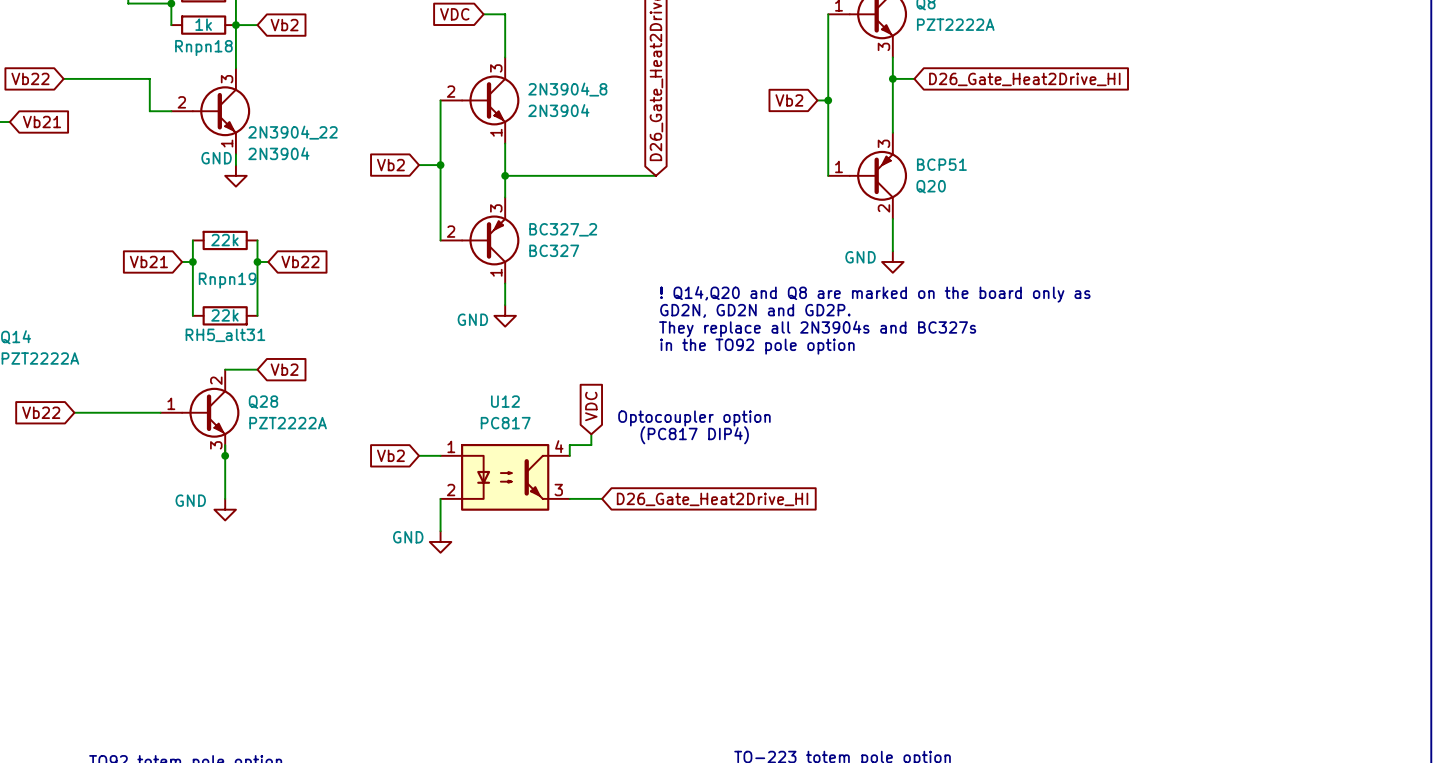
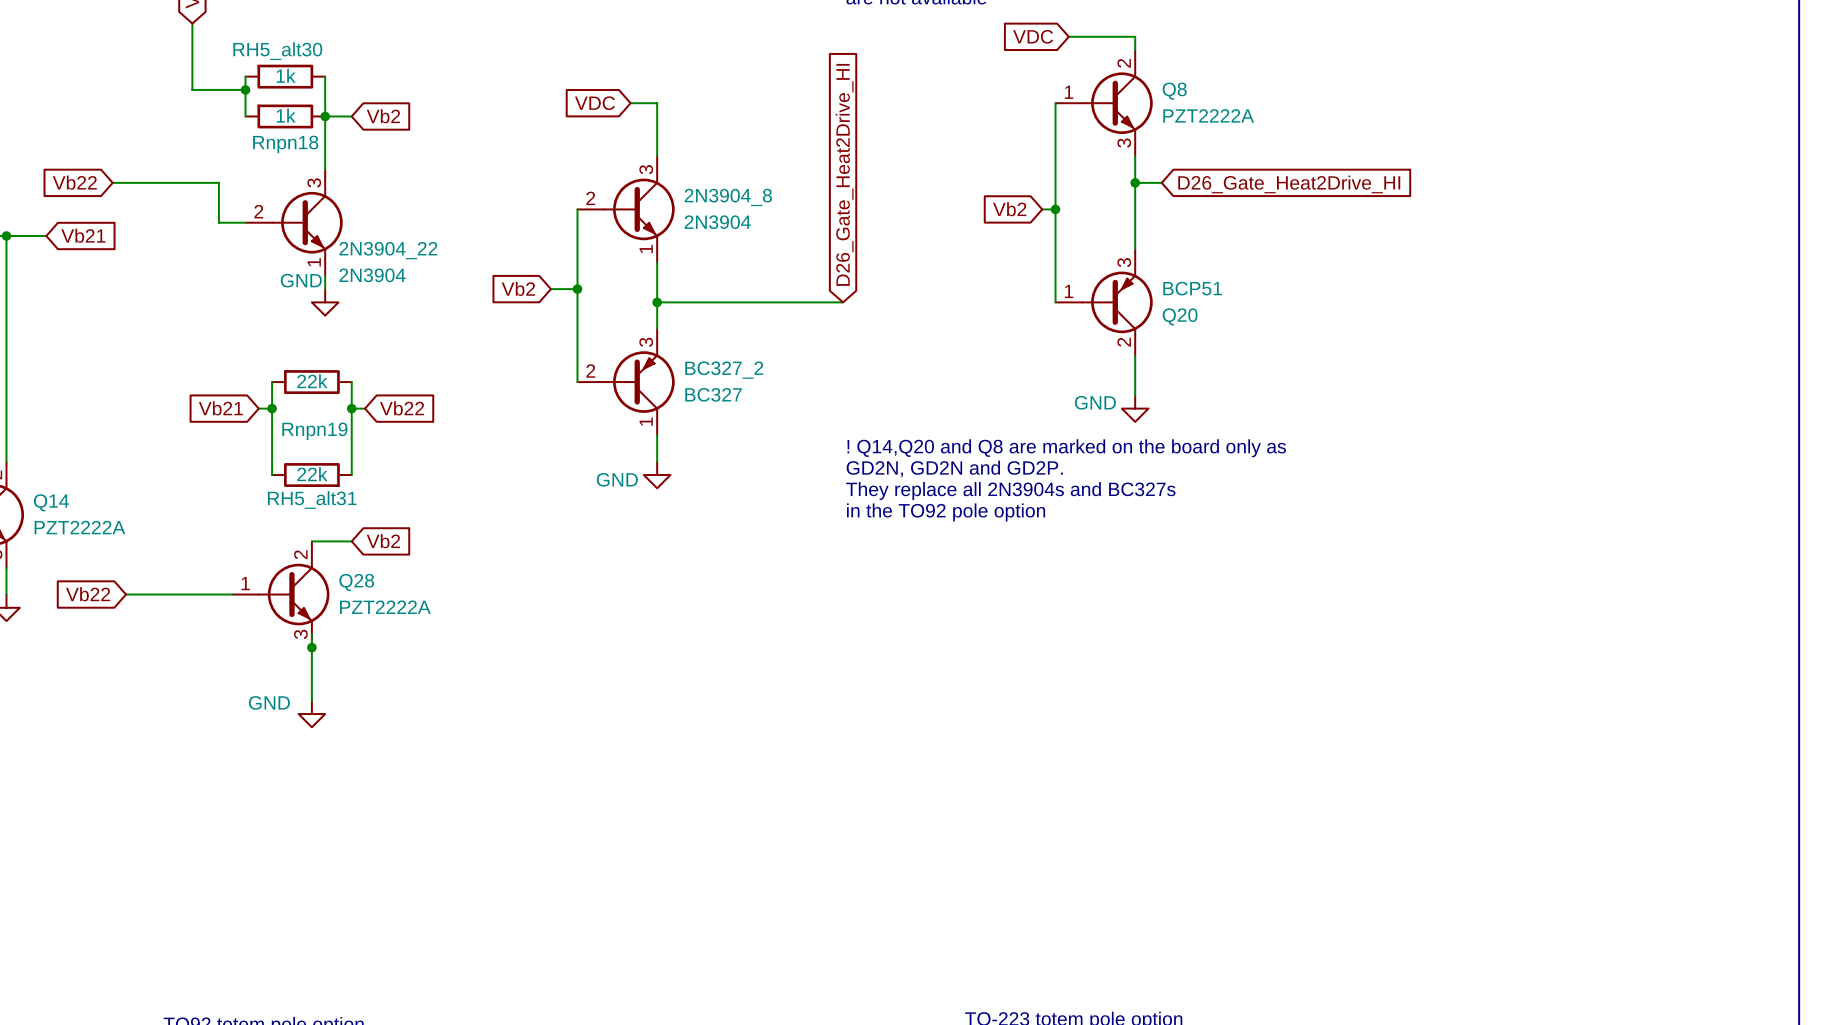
global label: VDC (591, 406) -> none
text: Optocoupler option (694, 418) -> none
wire: (591, 434) (591, 445) (569, 445) (569, 455) -> none
text: (PC817 DIP4) (694, 435) -> none
global label: Vb2 (390, 455) -> none
wire: (419, 455) (440, 455) -> none
U12: PC817 (505, 477) -> none
wire: (440, 498) (440, 531) -> none
wire: (569, 498) (602, 498) -> none
global label: D26_Gate_Heat2Drive_HI (712, 499) -> none
power symbol: GND (440, 541) -> none

